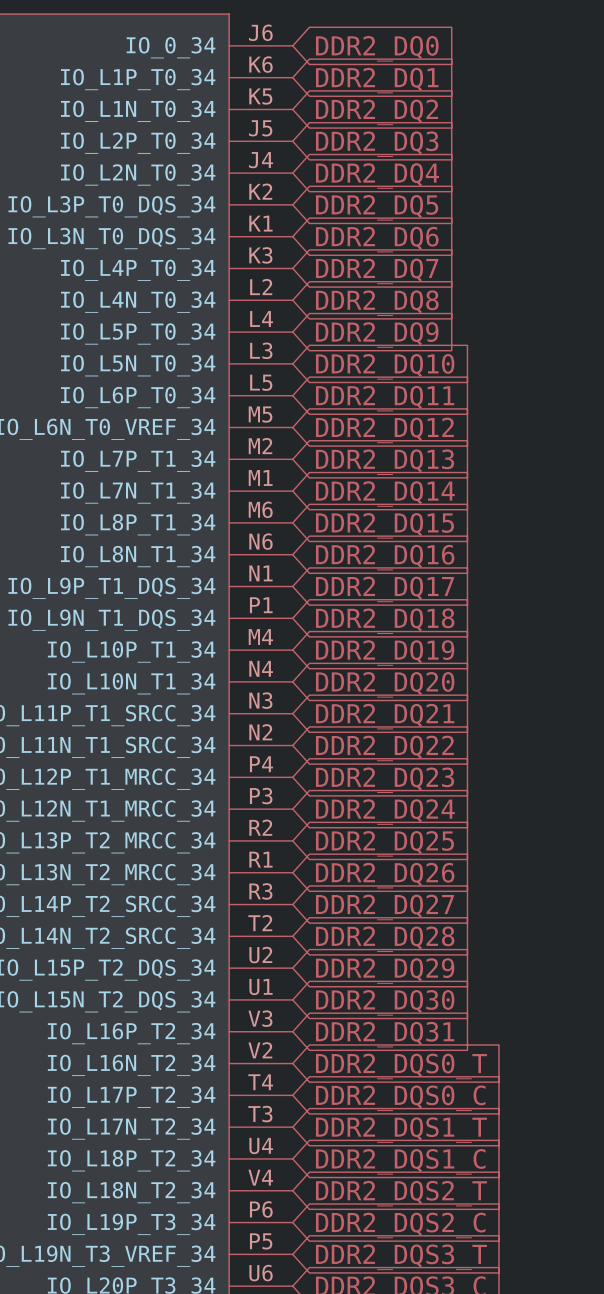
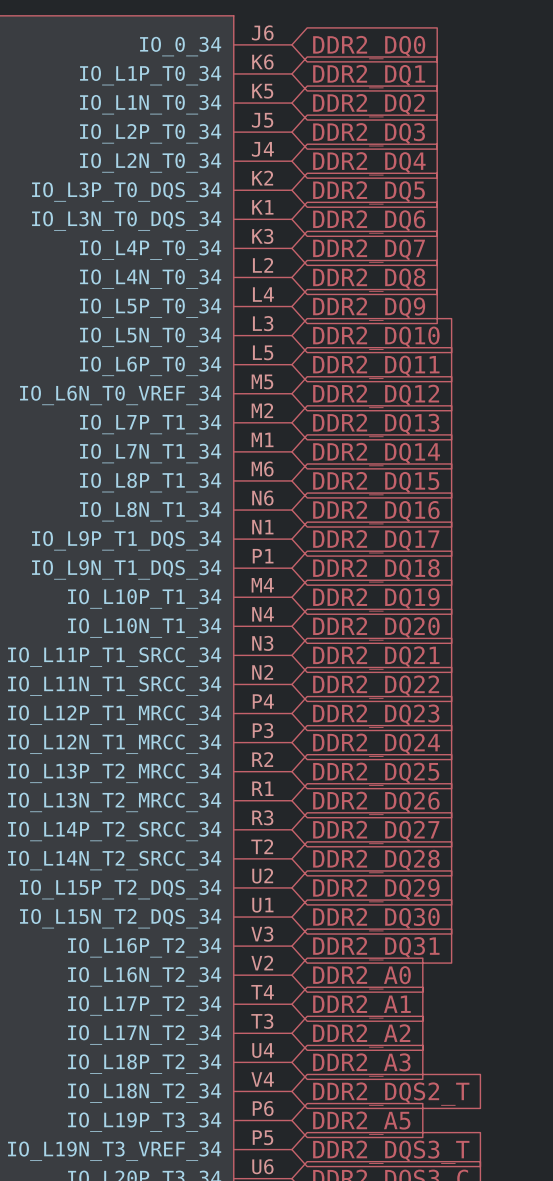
global label: DDR2_DQS0_T (401, 1066) -> DDR2_A0 (361, 977)
global label: DDR2_DQS0_C (400, 1098) -> DDR2_A1 (361, 1006)
global label: DDR2_DQS1_T (401, 1130) -> DDR2_A2 (361, 1035)
global label: DDR2_DQS1_C (400, 1161) -> DDR2_A3 (361, 1065)
global label: DDR2_DQS2_C (400, 1225) -> DDR2_A5 (361, 1123)

